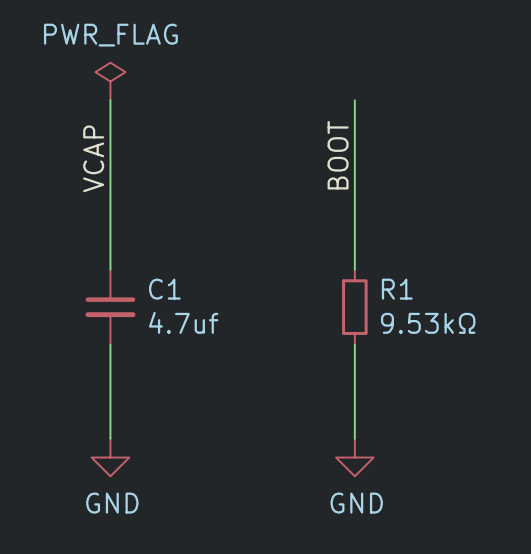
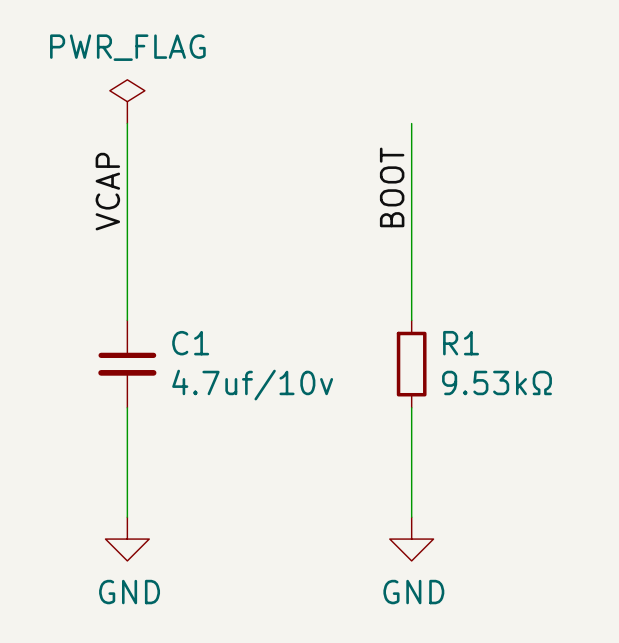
C1 value: 4.7uf (183, 322) -> 4.7uf/10v (252, 385)

